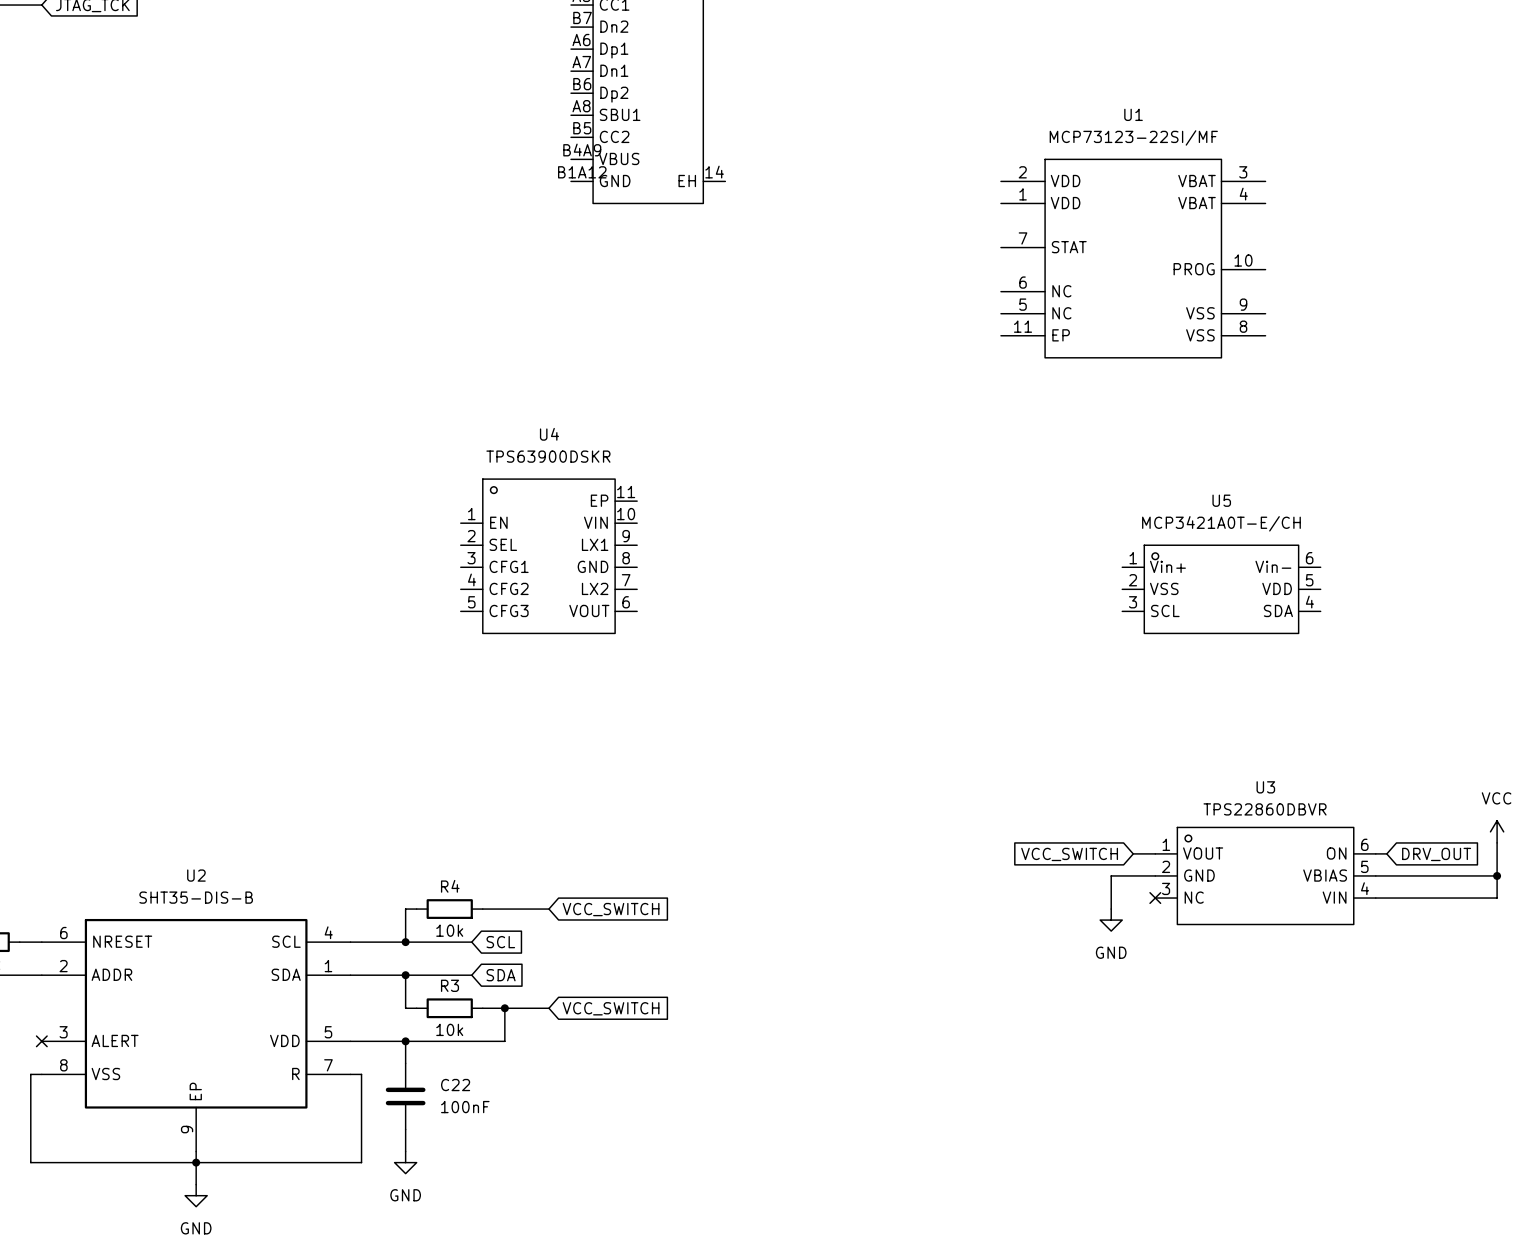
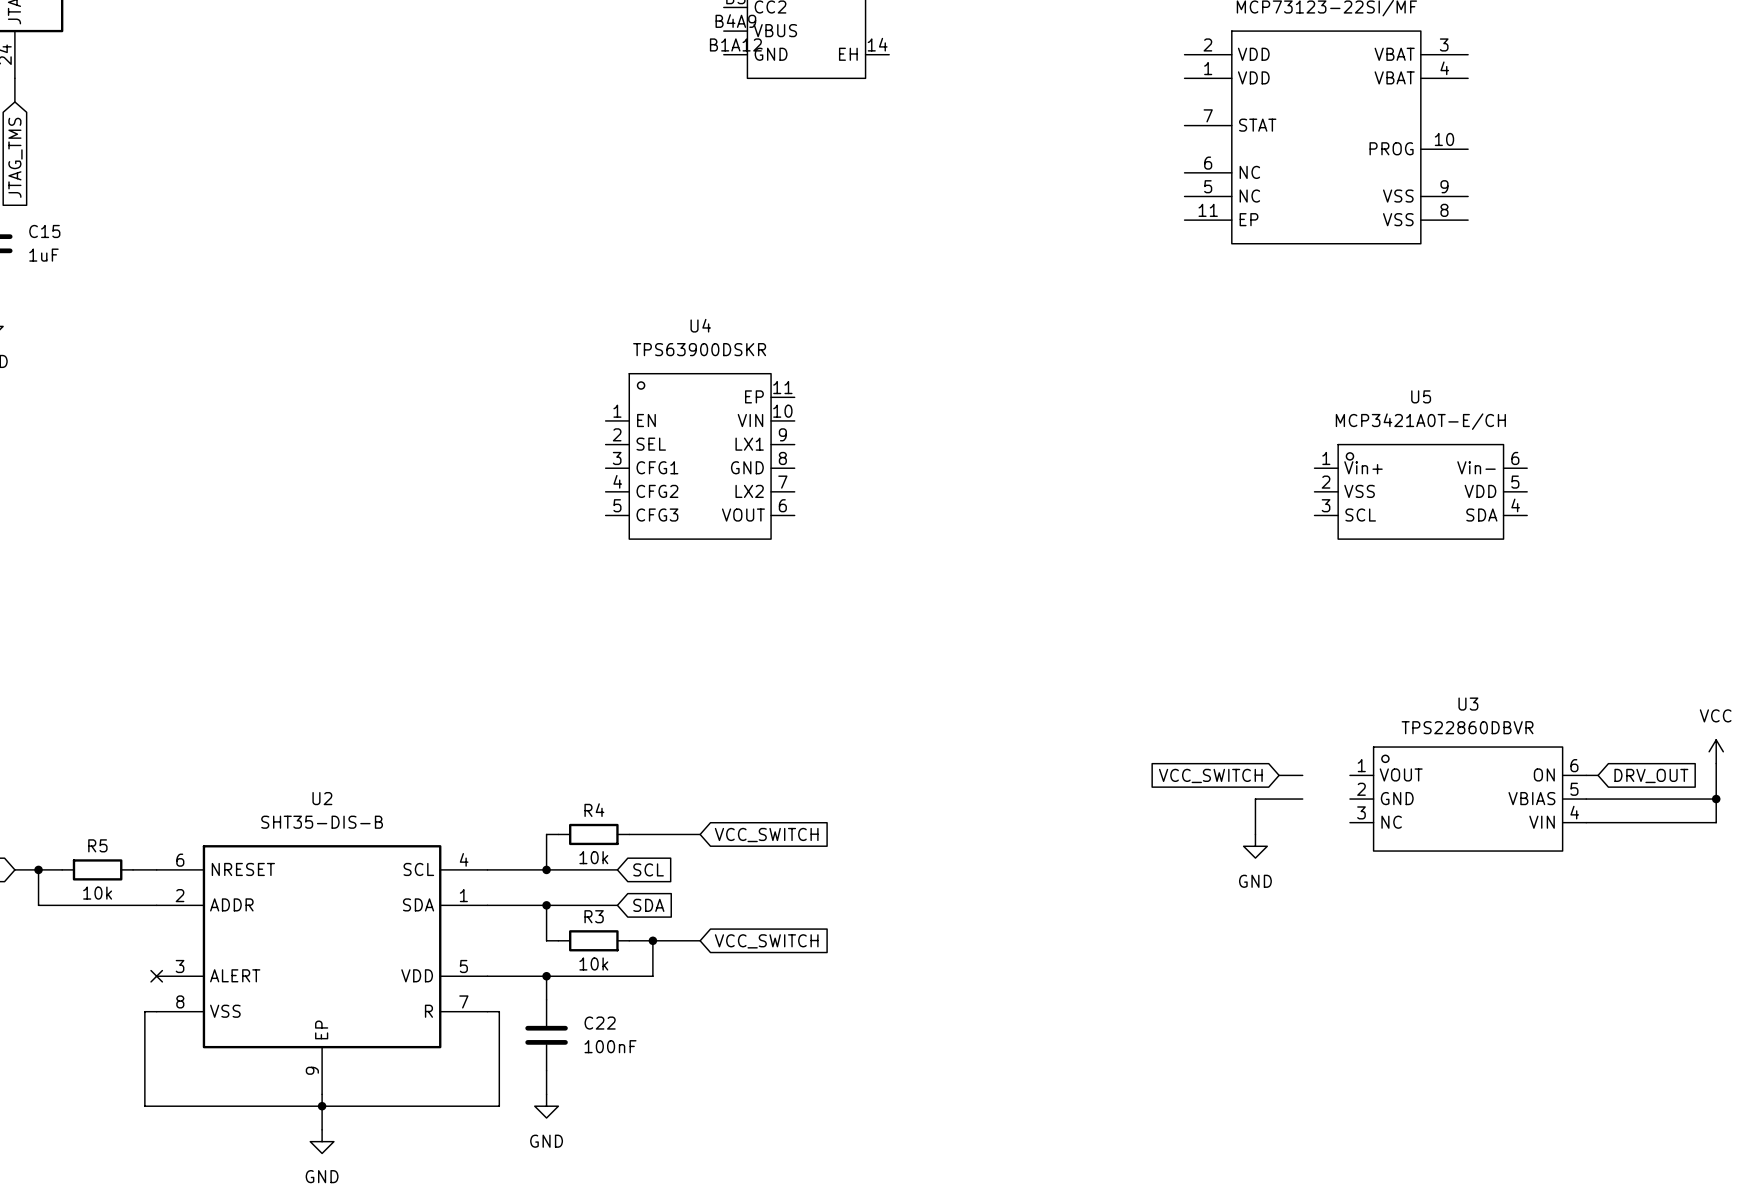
wire: (1133, 853) (1155, 853) -> (1279, 775) (1302, 775)
global label position: VCC_SWITCH (1069, 854) -> VCC_SWITCH (1210, 775)
wire: (1155, 875) (1111, 875) (1111, 909) -> (1302, 799) (1255, 799) (1255, 834)
no-connect mark: (1155, 898) -> none
power symbol position: GND (1111, 920) -> GND (1255, 846)

